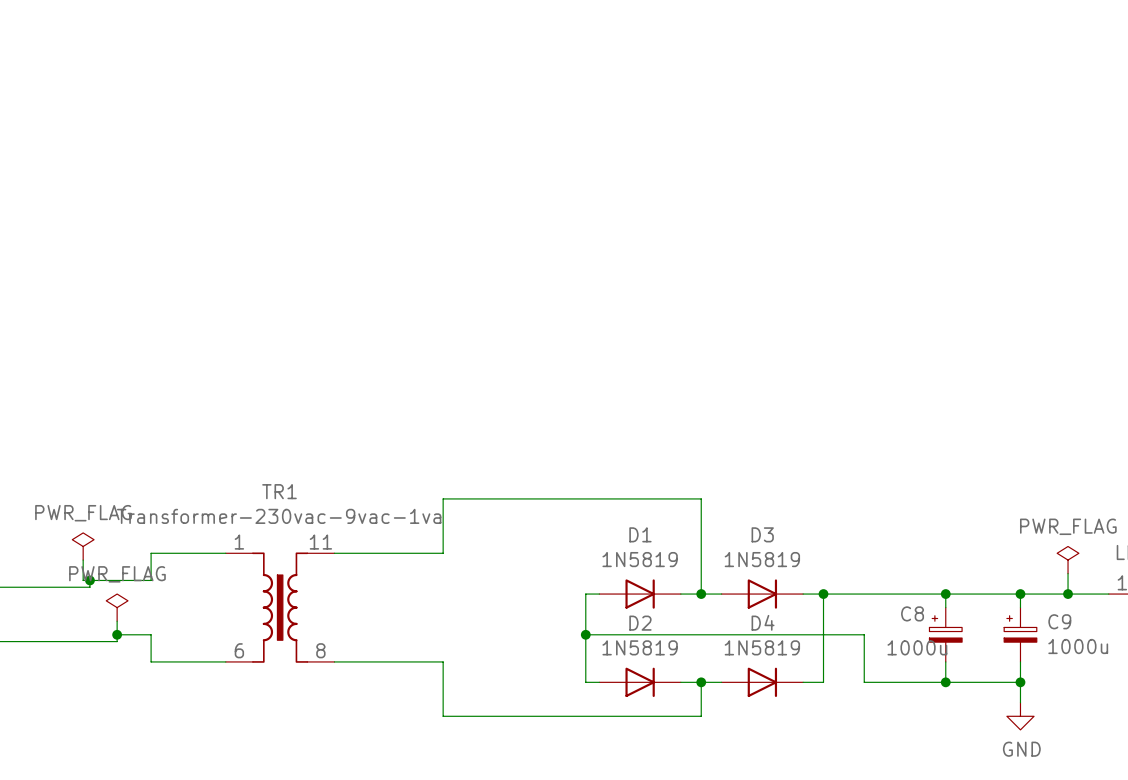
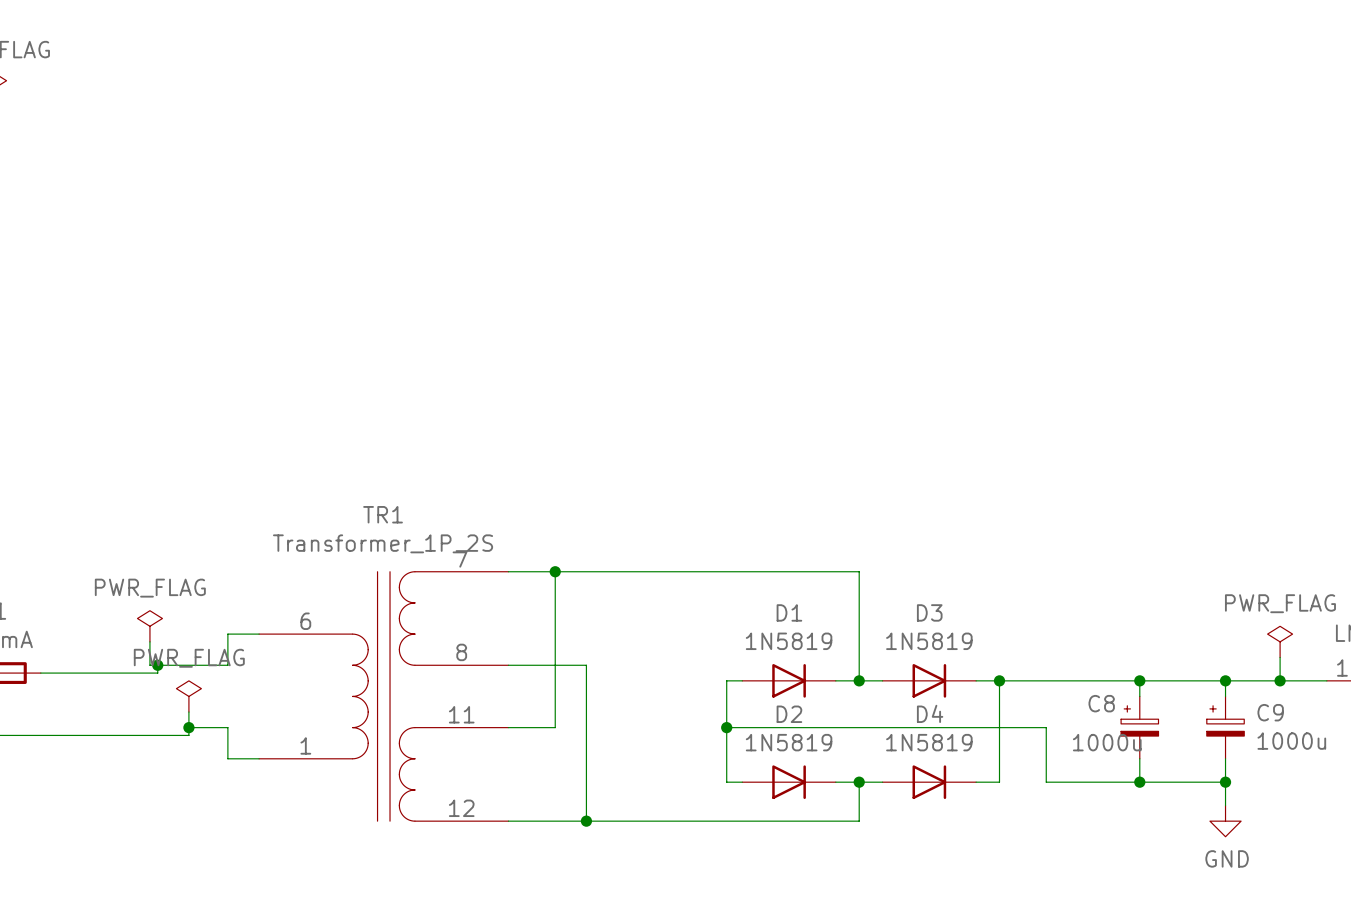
TR1 name position: TR1 (279, 491) -> TR1 (383, 514)
wire: none -> (555, 571) (555, 727) (508, 727)
junction: none -> (555, 571)
wire: (443, 498) (443, 553) (334, 553) -> (563, 571) (508, 571)
TR1 value: Transformer-230vac-9vac-1va (279, 516) -> Transformer_1P_2S (383, 543)
TR1 symbol: [225, 552, 335, 663] -> [259, 571, 509, 822]
wire: none -> (508, 665) (586, 665) (586, 821)
wire: (334, 661) (443, 661) (443, 716) -> (508, 821) (563, 821)
junction: none -> (586, 821)

